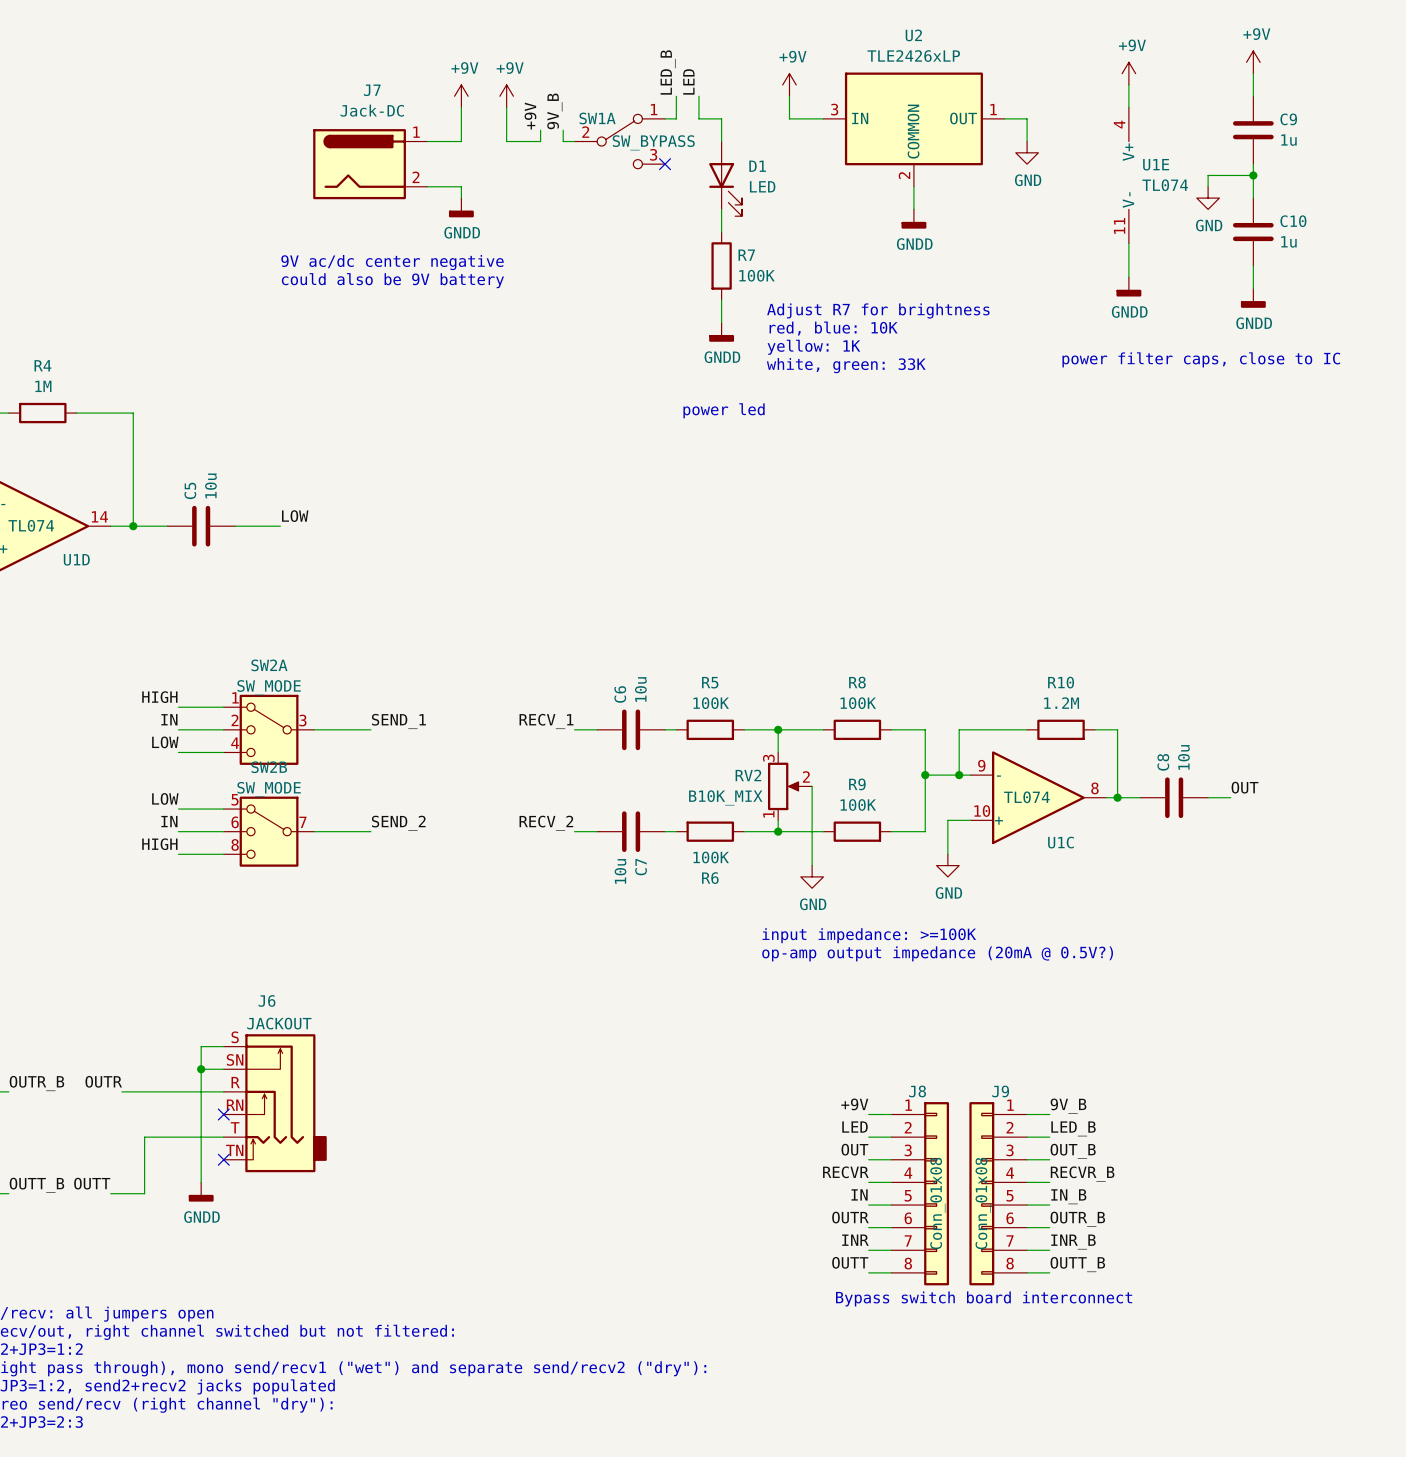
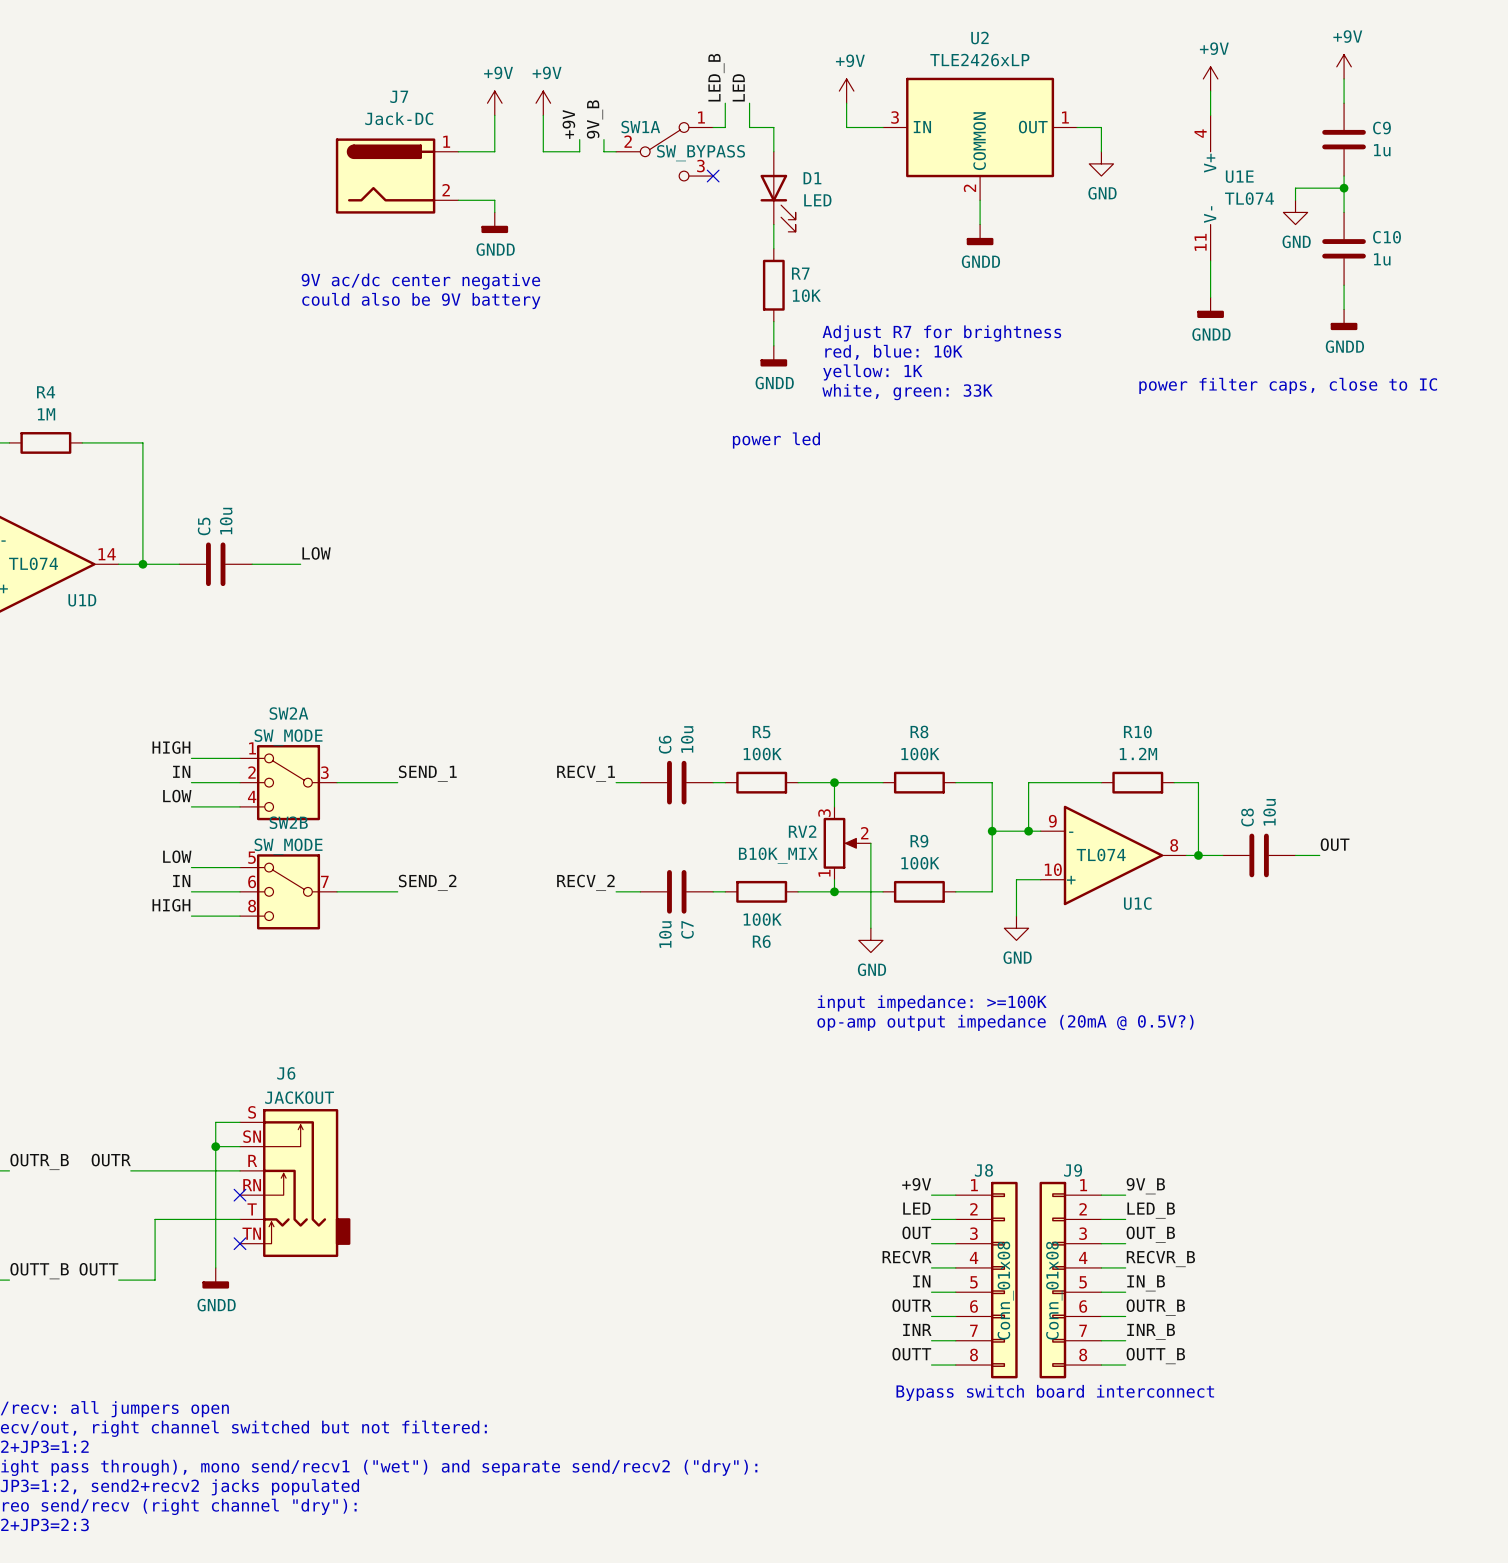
R7 value: 100K (757, 275) -> 10K (806, 295)

